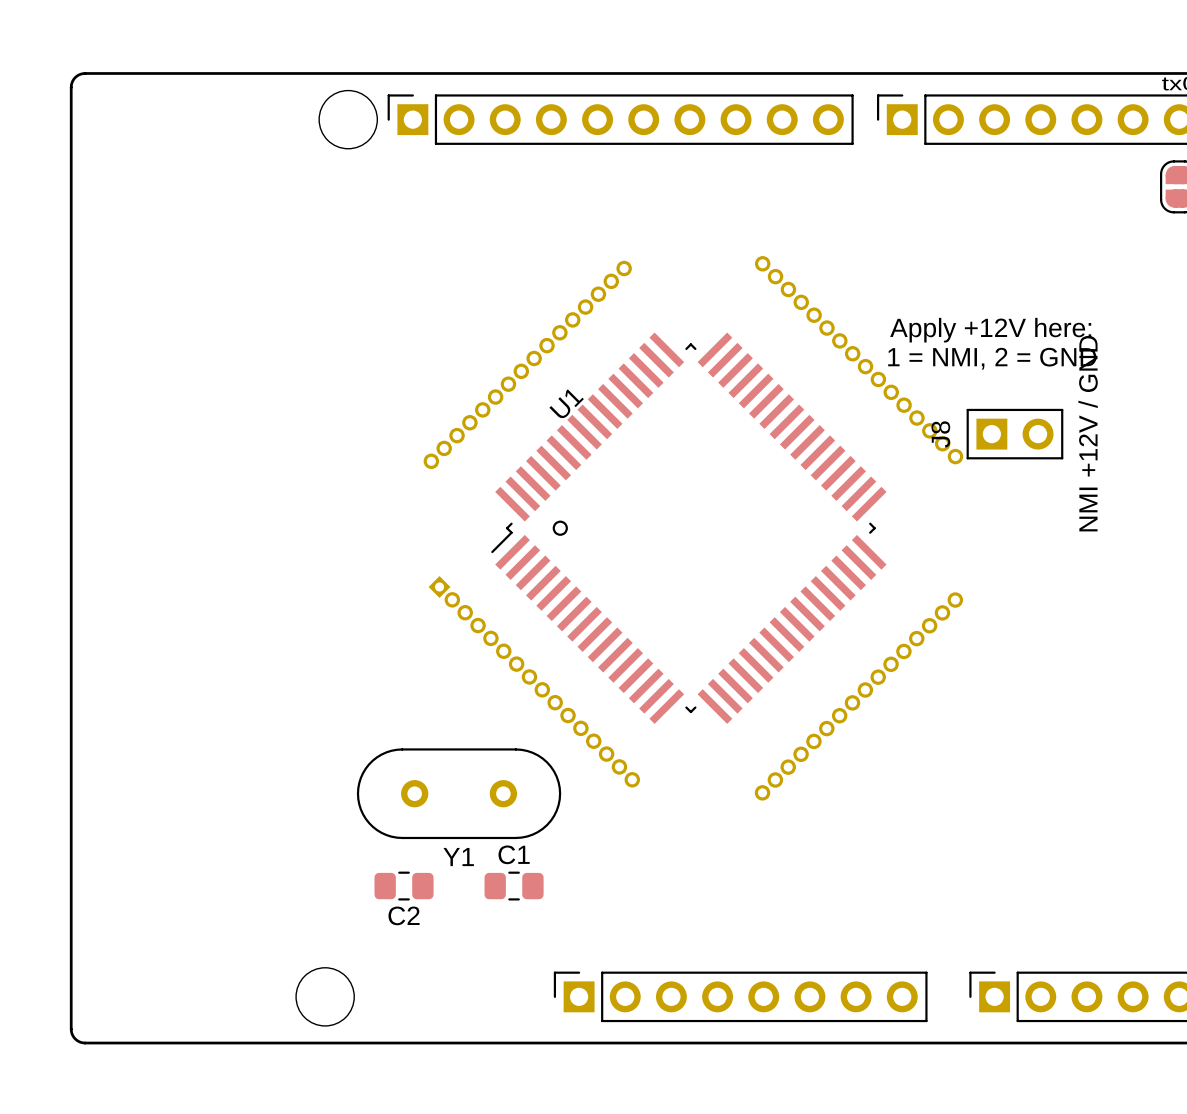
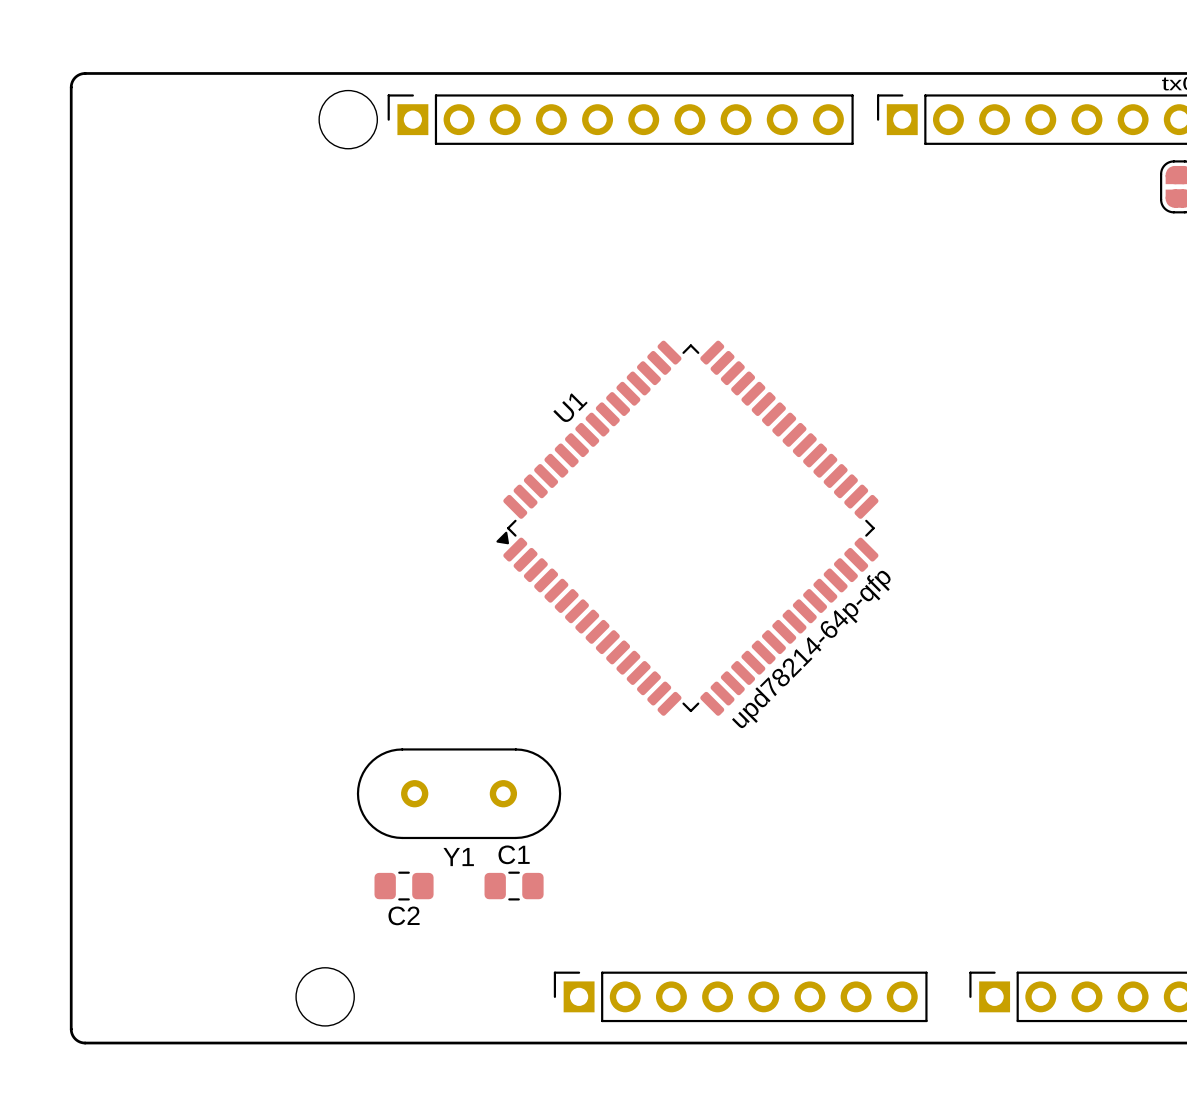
U1 footprint: [423, 256, 964, 801] -> [496, 340, 879, 716]
text: Apply +12V here: (990, 330) -> none
text: 1 = NMI, 2 = GND (992, 358) -> none
J8: NMI +12V / GND (1014, 434) -> none
U1 value: none -> upd78214-64p-qfp (812, 649)

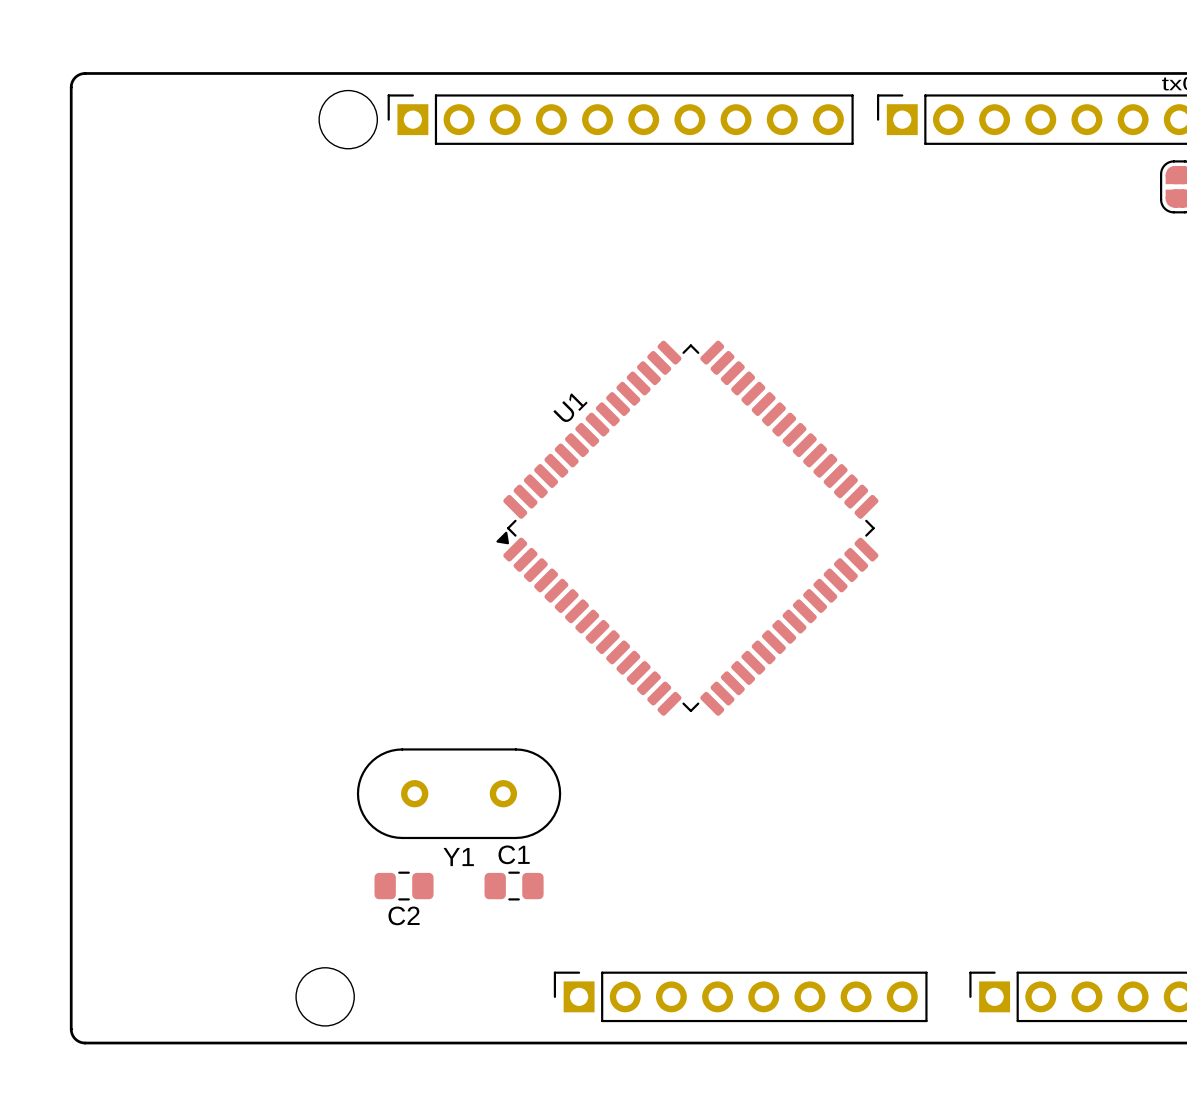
U1 value: upd78214-64p-qfp (812, 649) -> none

